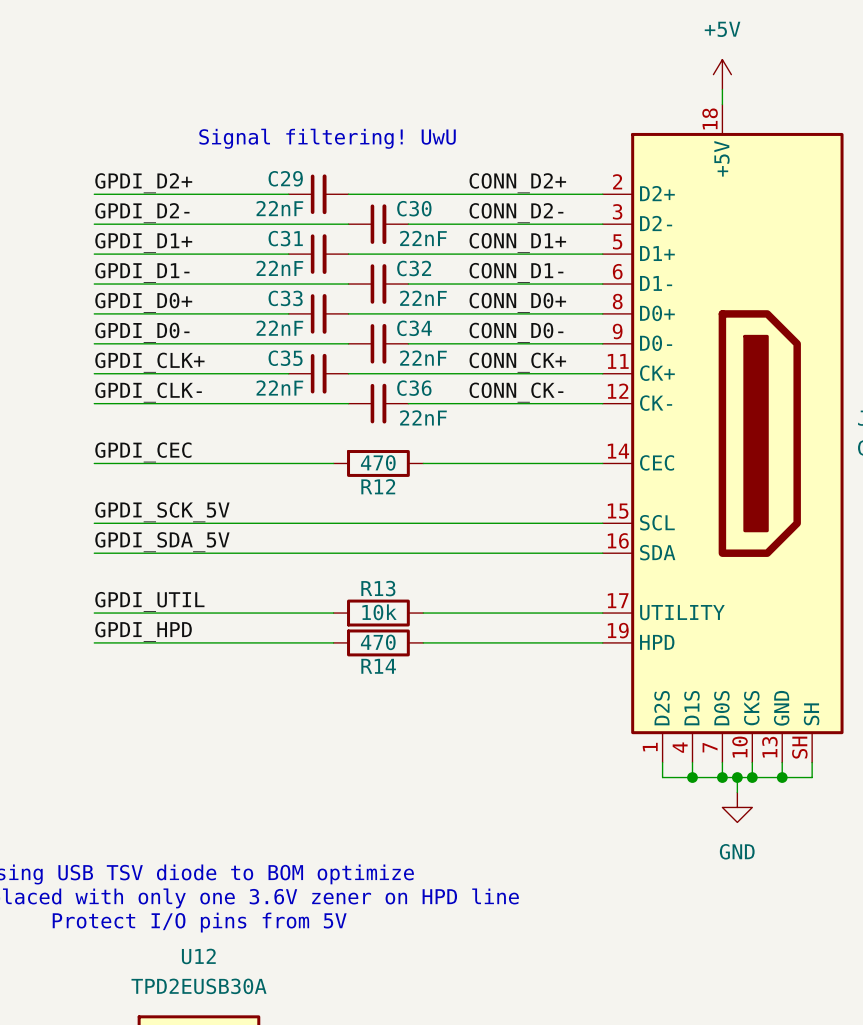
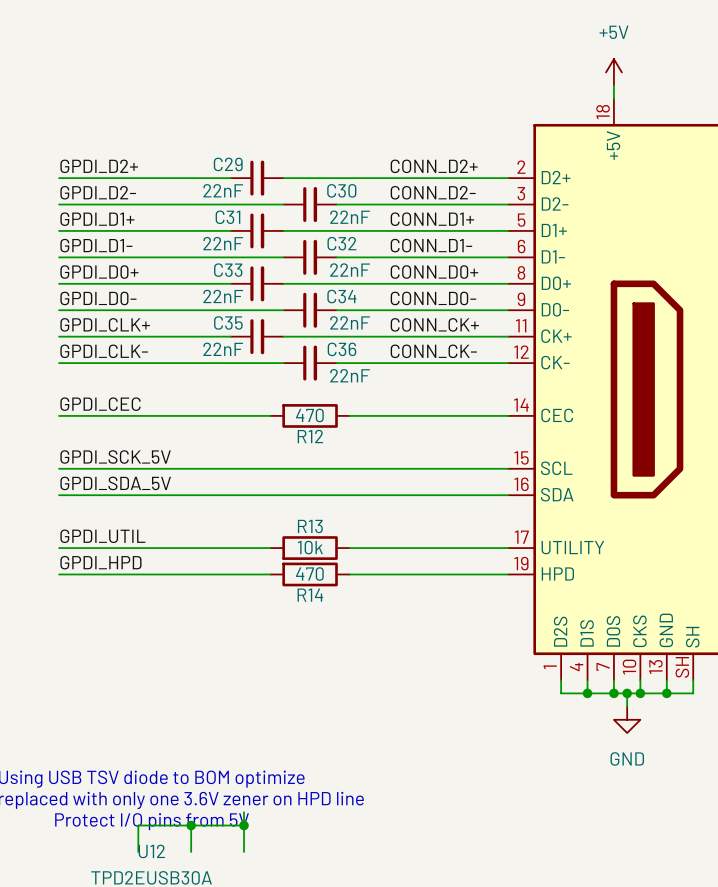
text: Signal filtering! UwU (327, 138) -> none
wire: none -> (244, 812) (244, 851)
wire: none -> (191, 825) (191, 851)
junction: none -> (191, 825)
wire: none -> (244, 825) (138, 825) (138, 851)
junction: none -> (244, 825)

